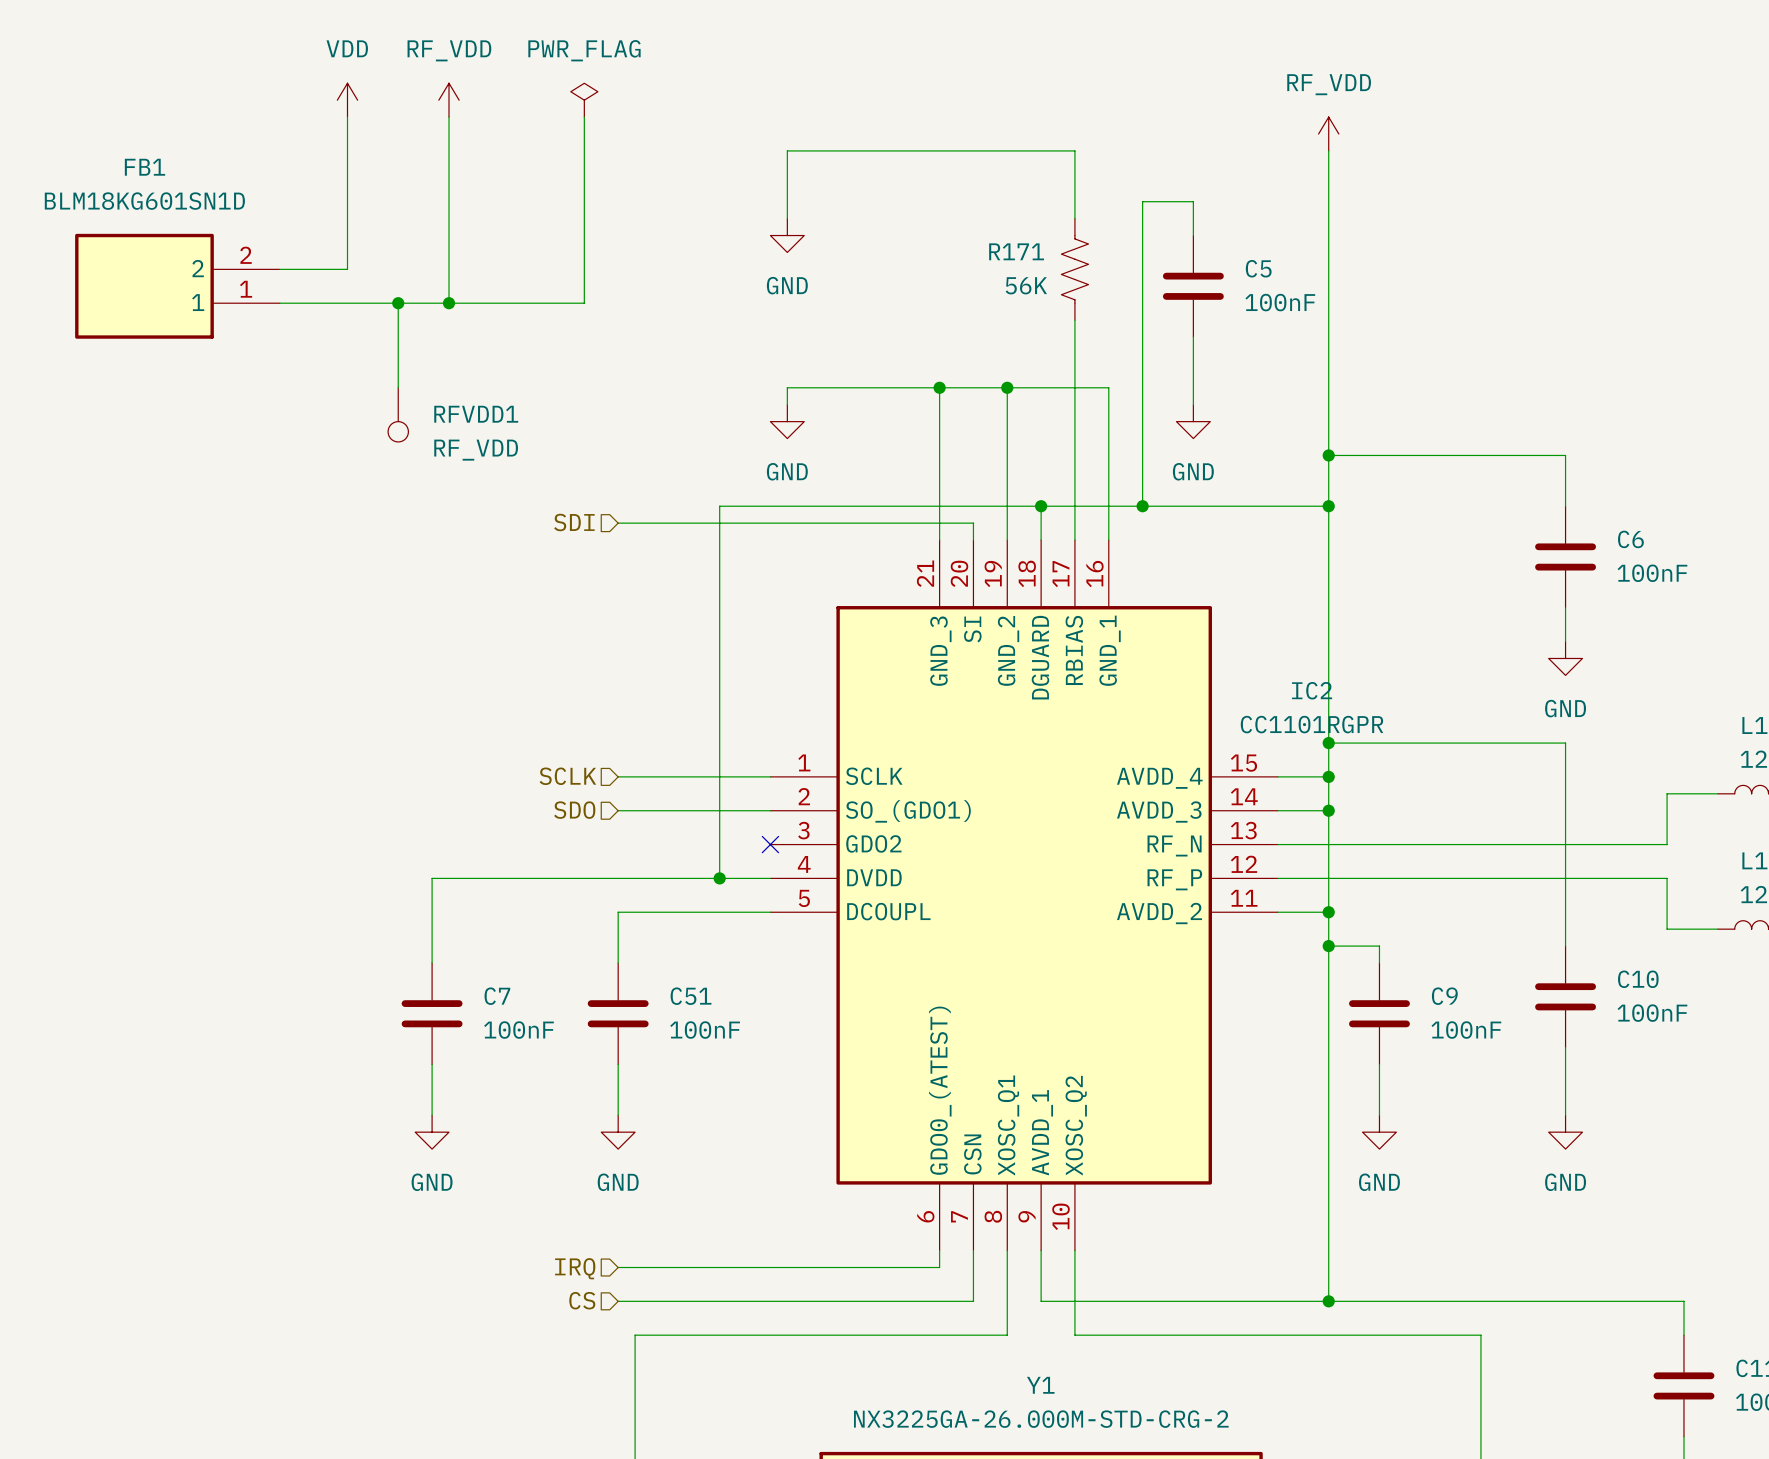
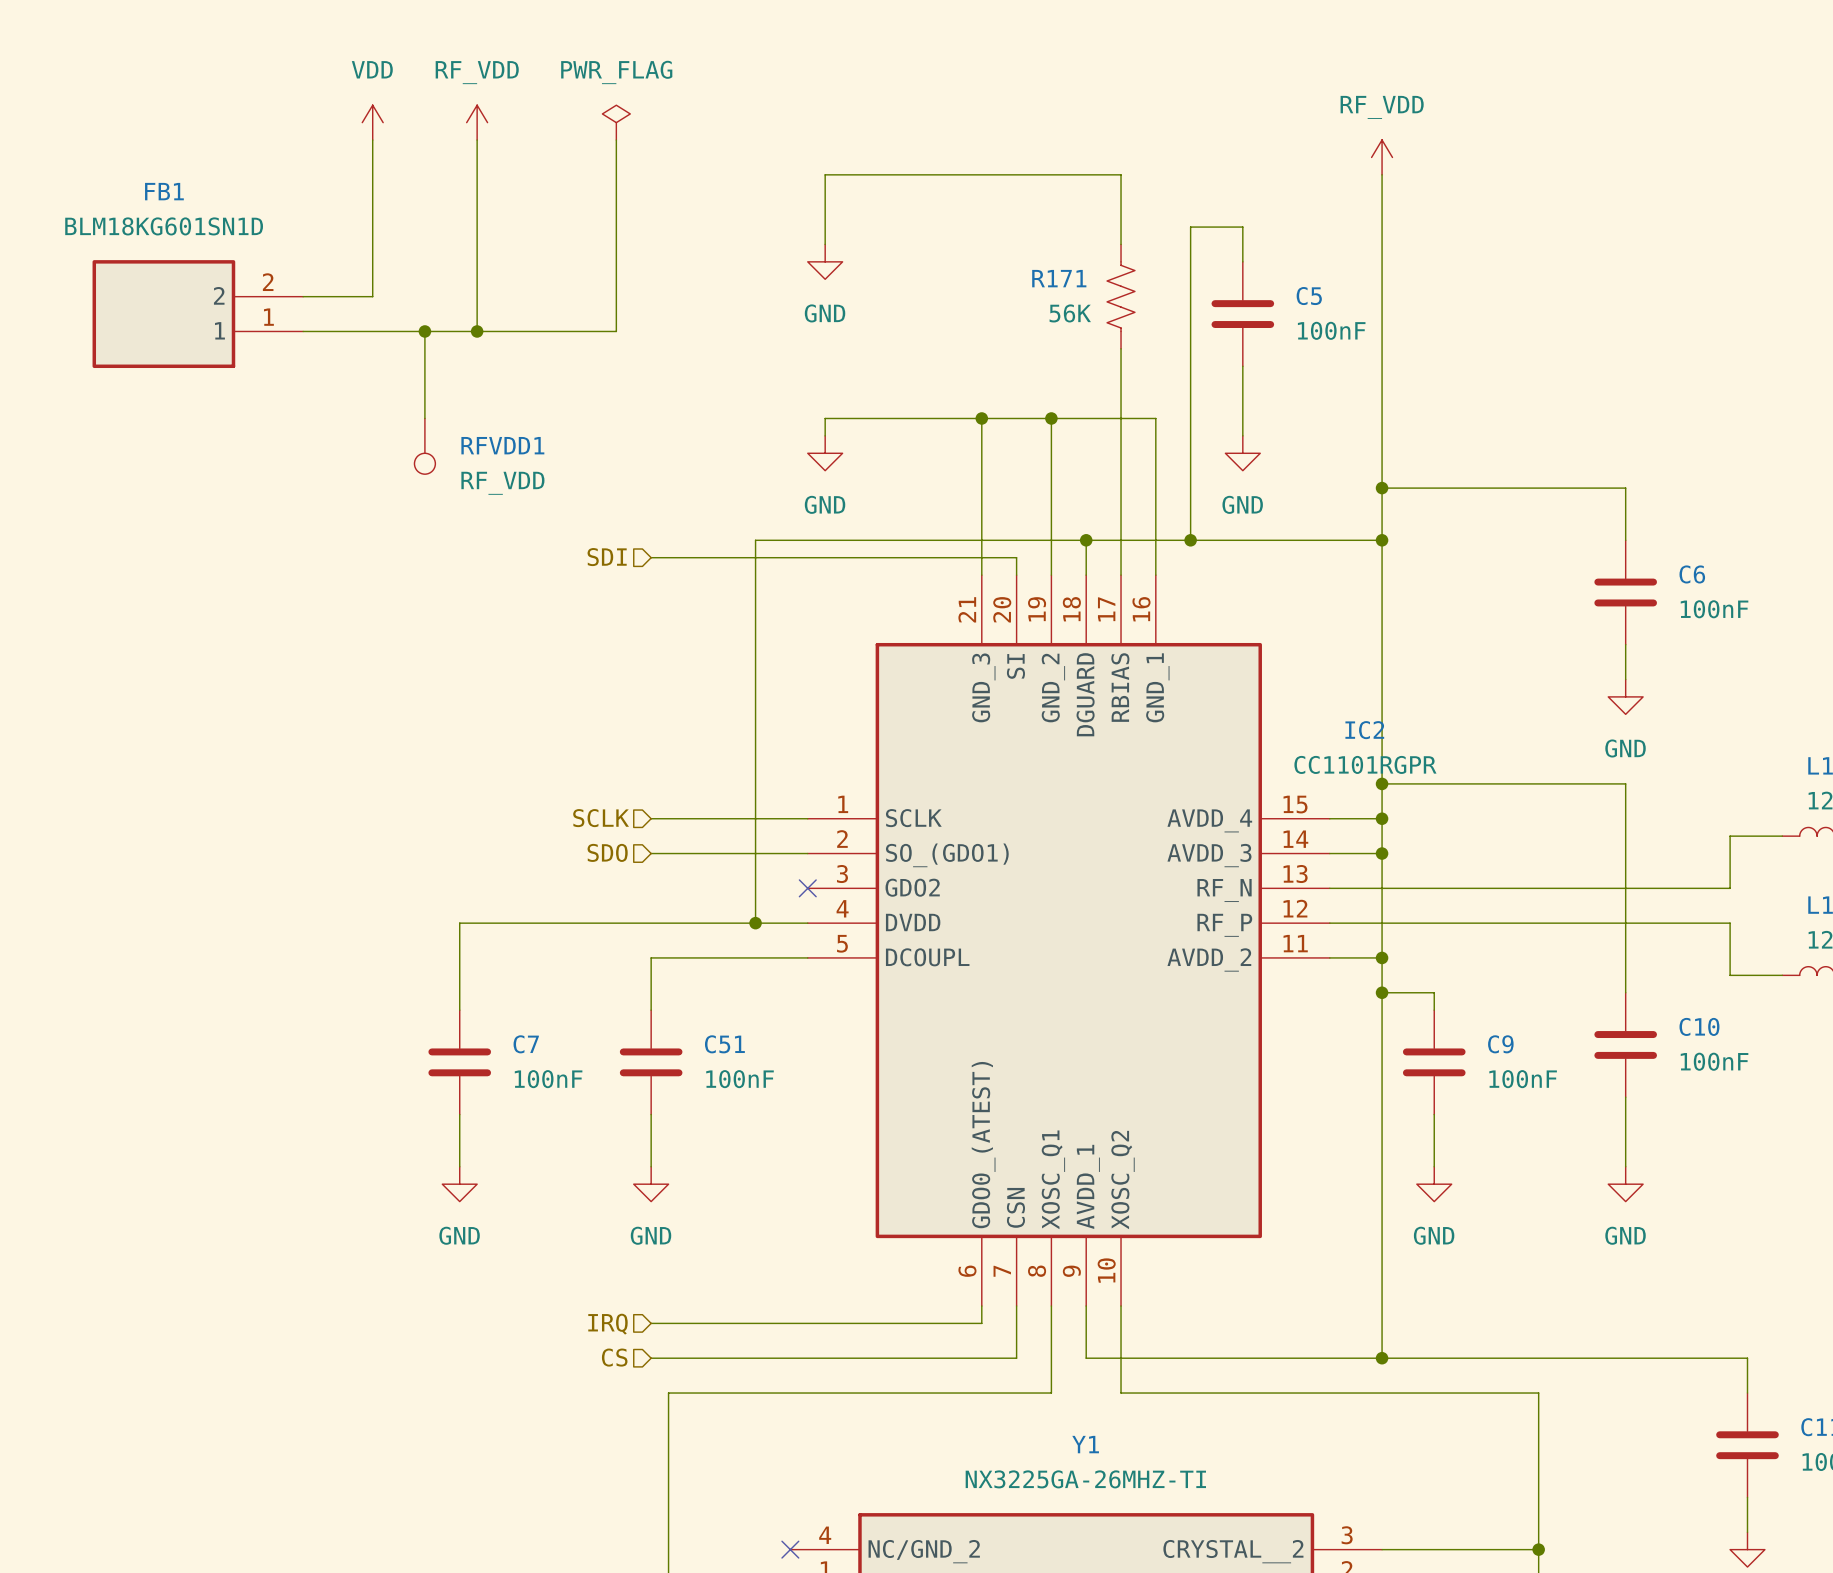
Y1 value: NX3225GA-26.000M-STD-CRG-2 (1041, 1419) -> NX3225GA-26MHZ-TI (1085, 1479)

